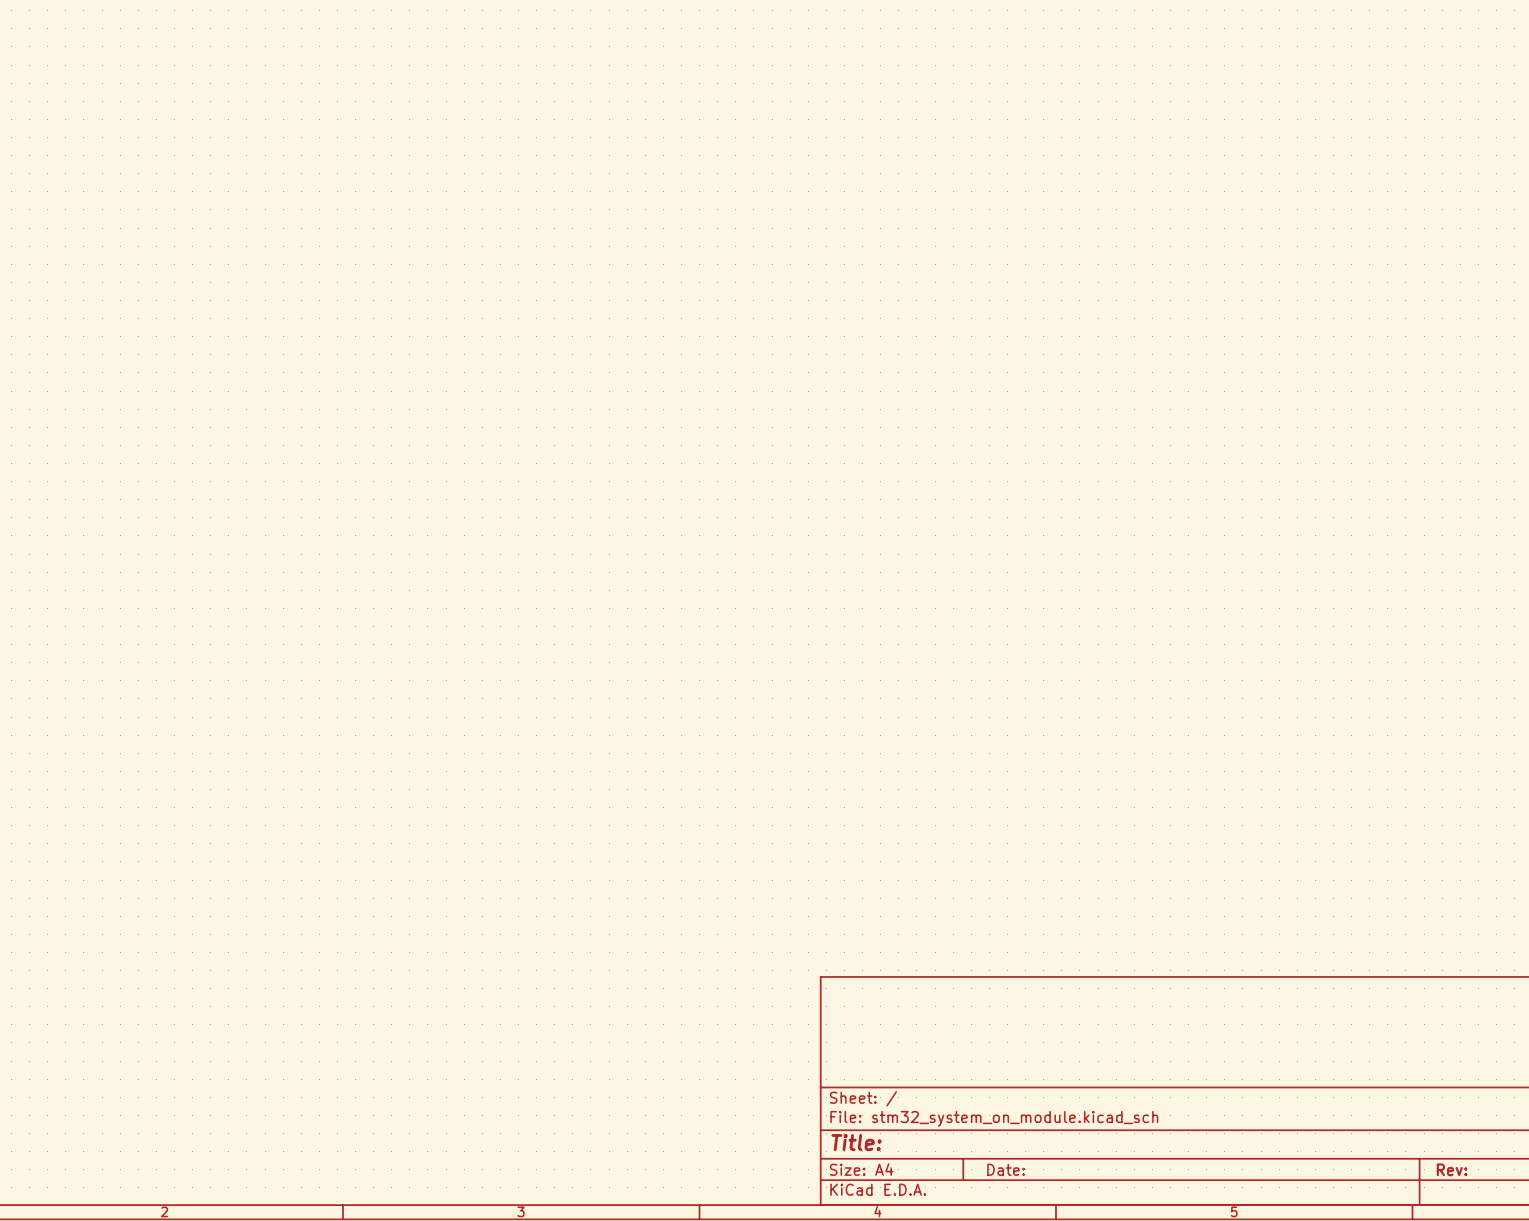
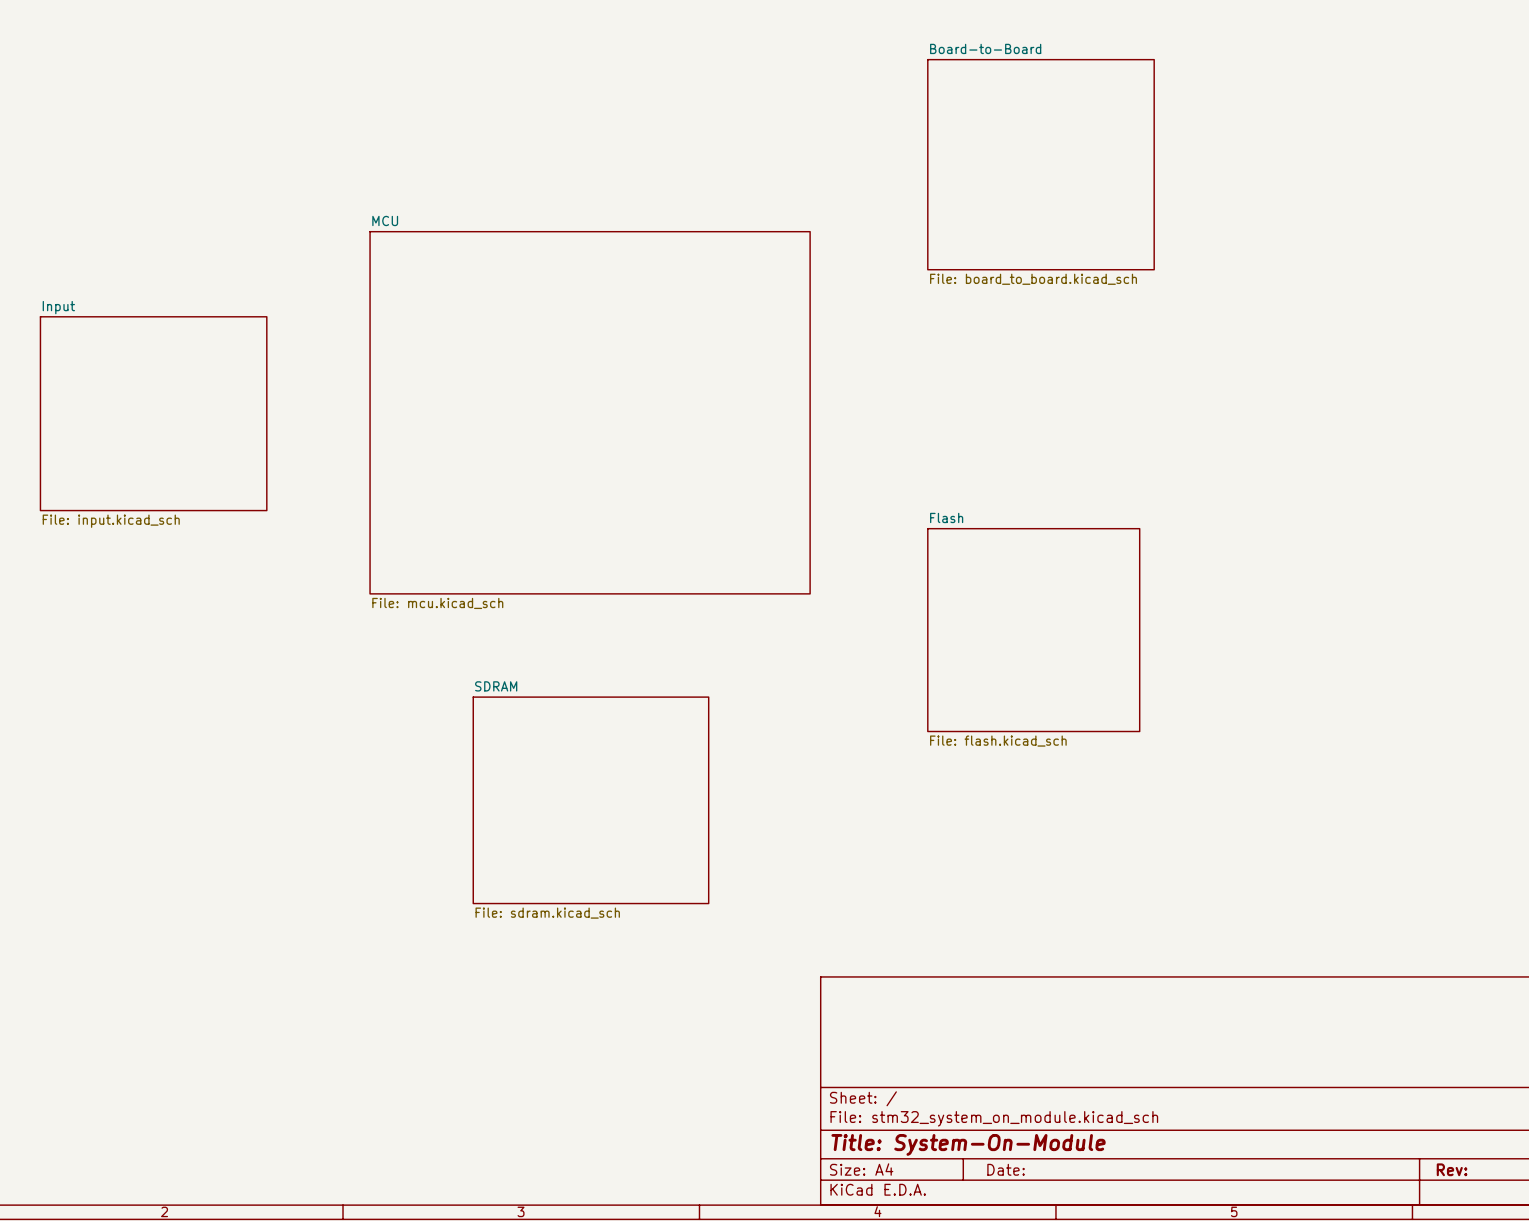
sheet Board-to-Board: none -> File: board_to_board.kicad_sch (1040, 164)
sheet MCU: none -> File: mcu.kicad_sch (590, 412)
sheet Input: none -> File: input.kicad_sch (153, 413)
sheet Flash: none -> File: flash.kicad_sch (1033, 630)
sheet SDRAM: none -> File: sdram.kicad_sch (590, 800)
title block: Title: (856, 1142) -> Title: System-On-Module (968, 1144)

